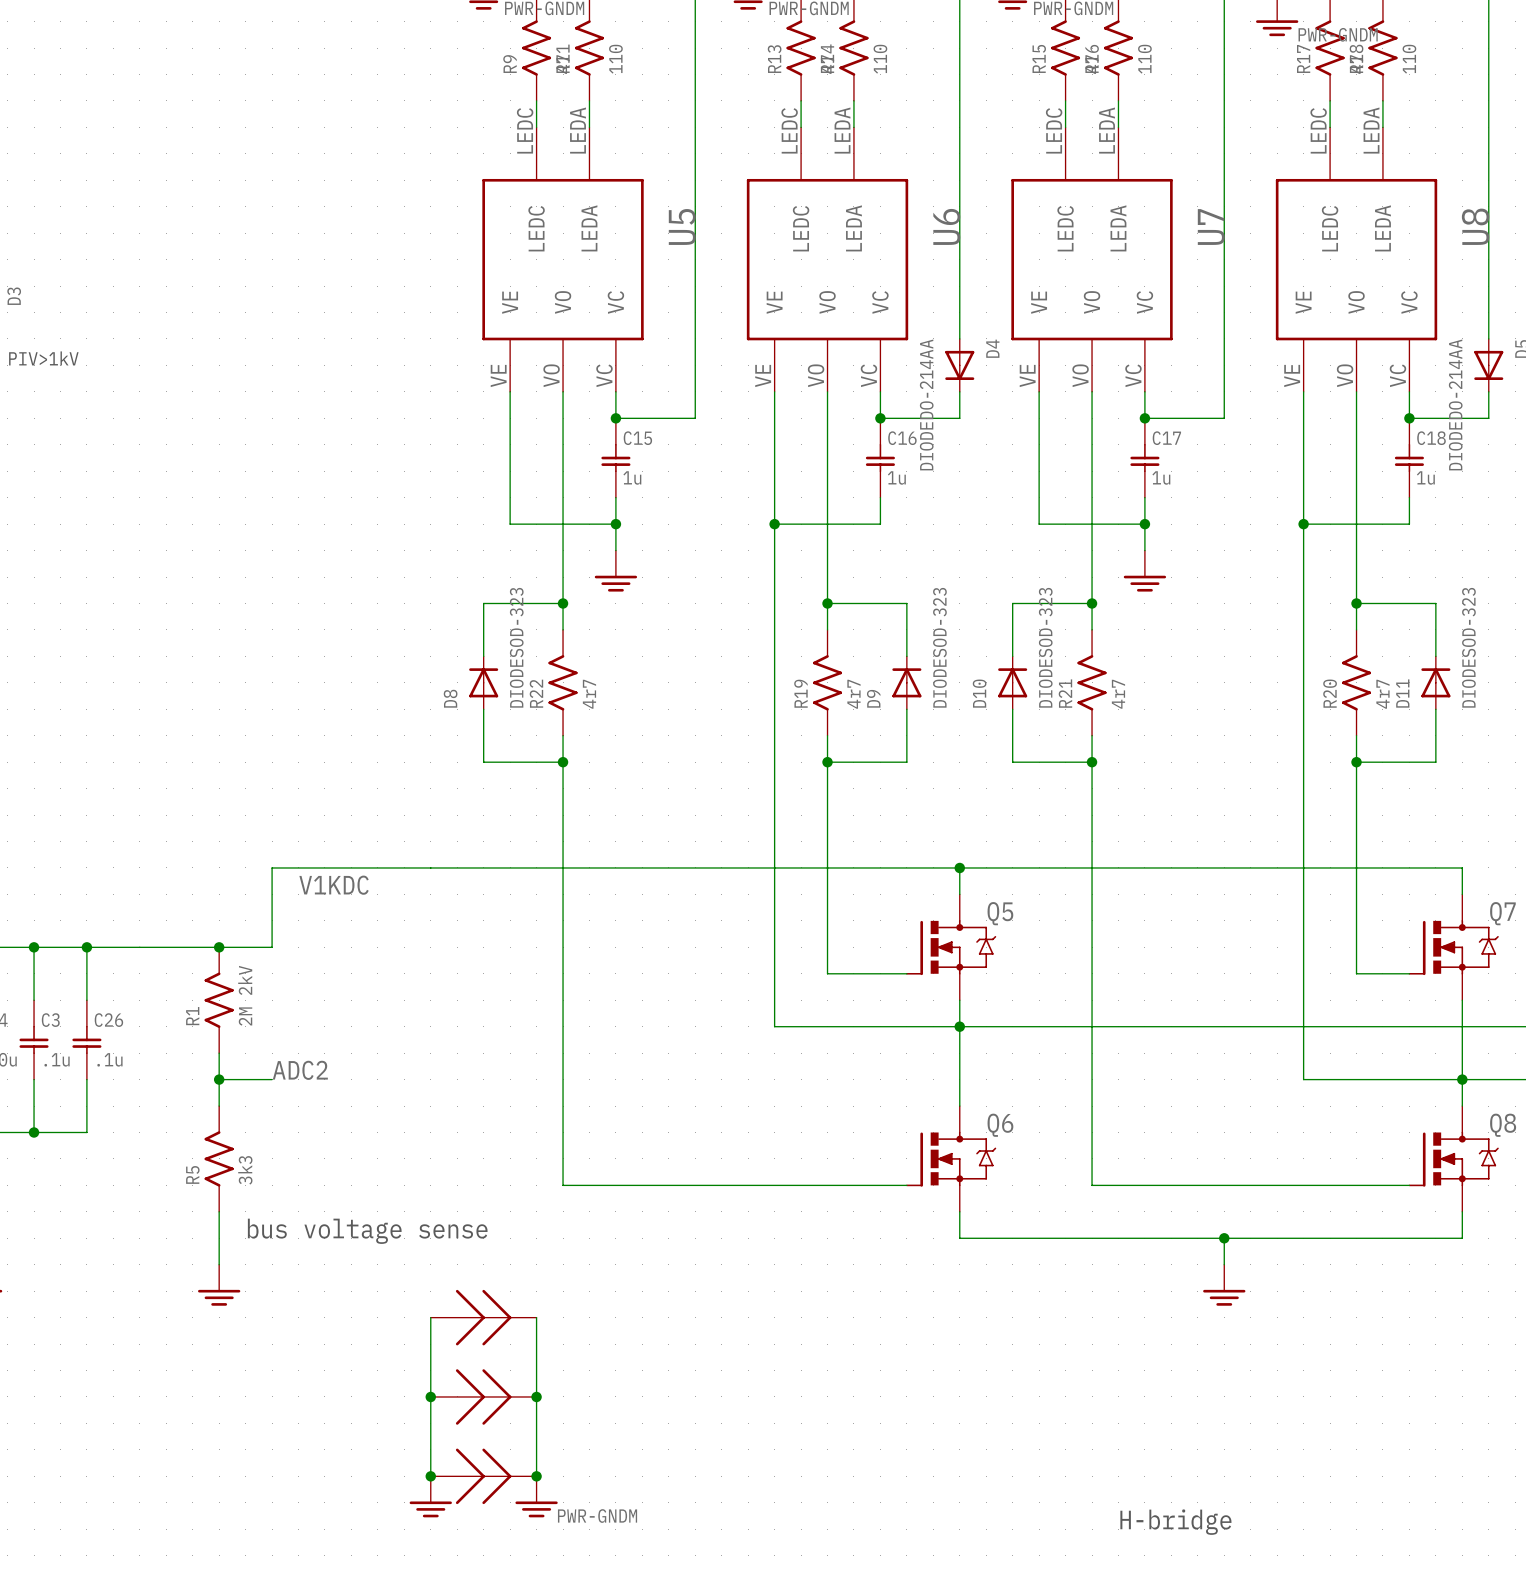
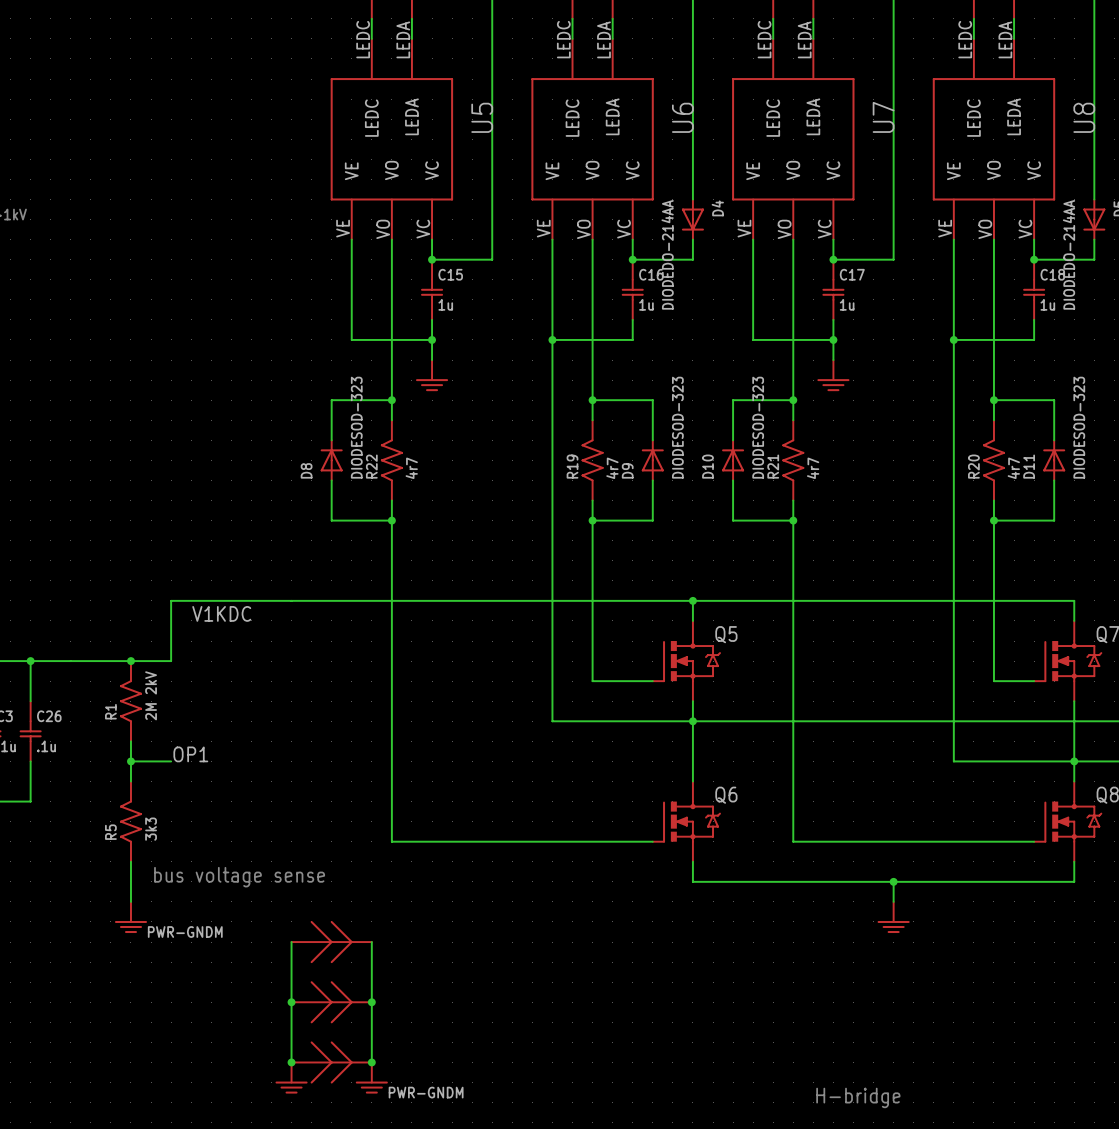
label: ADC2 (300, 1070) -> OP1 (190, 754)
power symbol text: none -> PWR-GNDM (185, 932)

